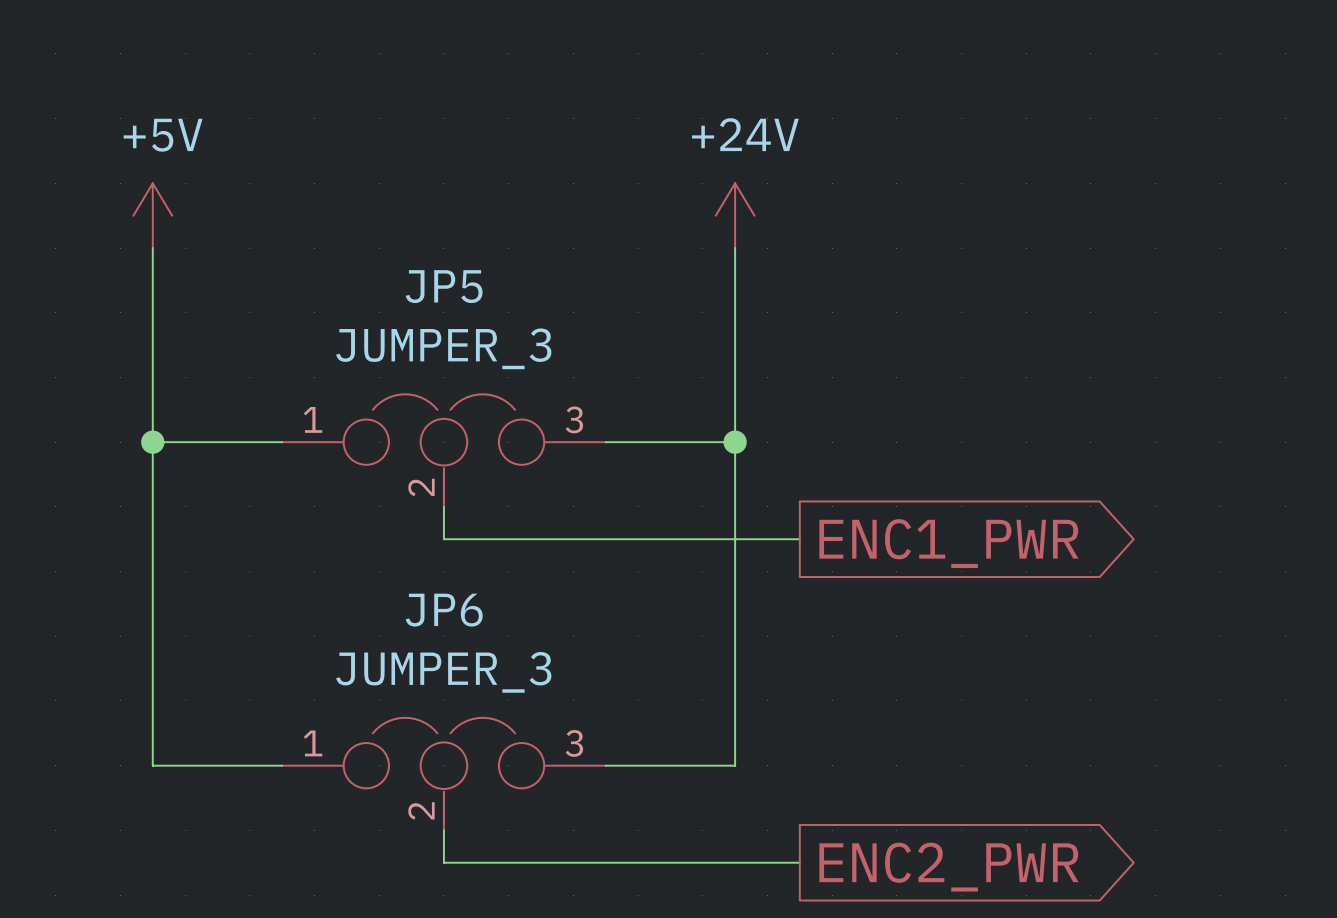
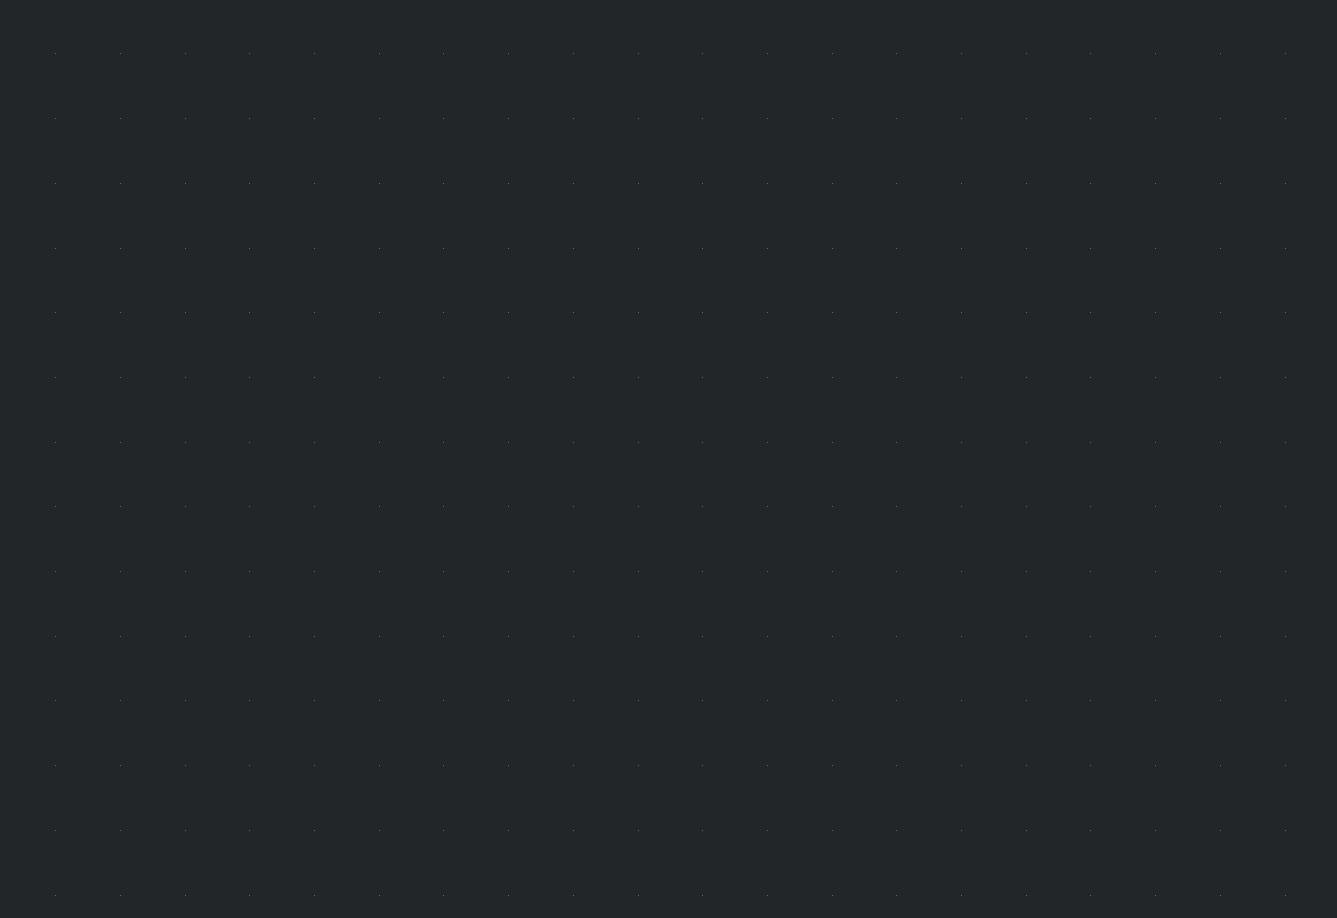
power symbol: +5V (152, 215) -> none
power symbol: +24V (735, 215) -> none
wire: (152, 248) (152, 765) (282, 765) -> none
wire: (735, 248) (735, 765) (605, 765) -> none
wire: (152, 442) (282, 442) -> none
junction: (152, 442) -> none
wire: (605, 442) (735, 442) -> none
junction: (735, 442) -> none
JP5: JUMPER_3 (443, 450) -> none
wire: (443, 506) (443, 539) (799, 539) -> none
global label: ENC1_PWR (948, 543) -> none
JP6: JUMPER_3 (443, 774) -> none
wire: (443, 830) (443, 862) (799, 862) -> none
global label: ENC2_PWR (948, 867) -> none

